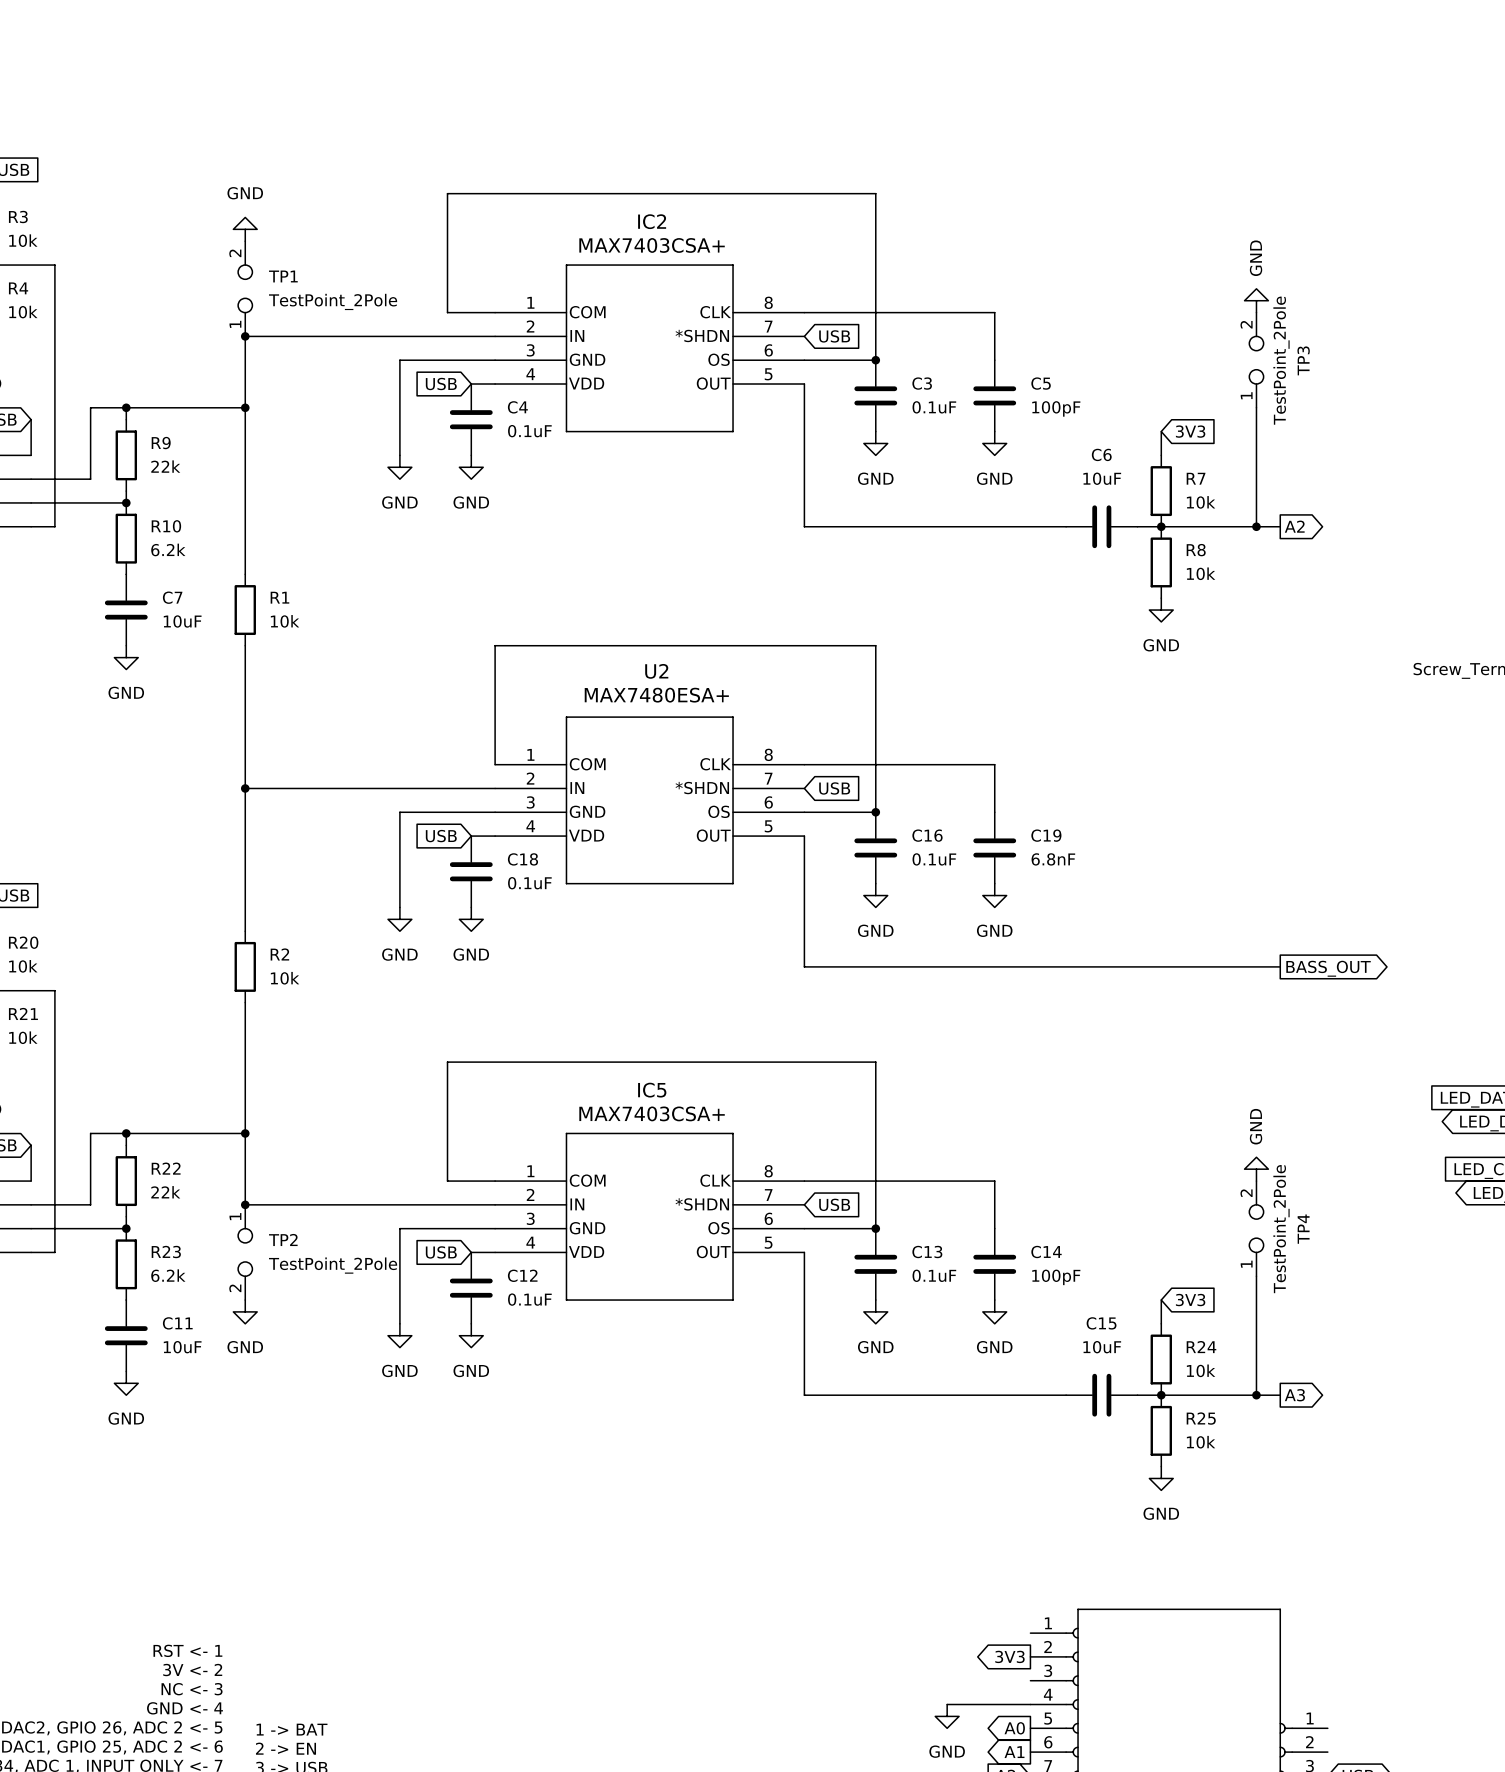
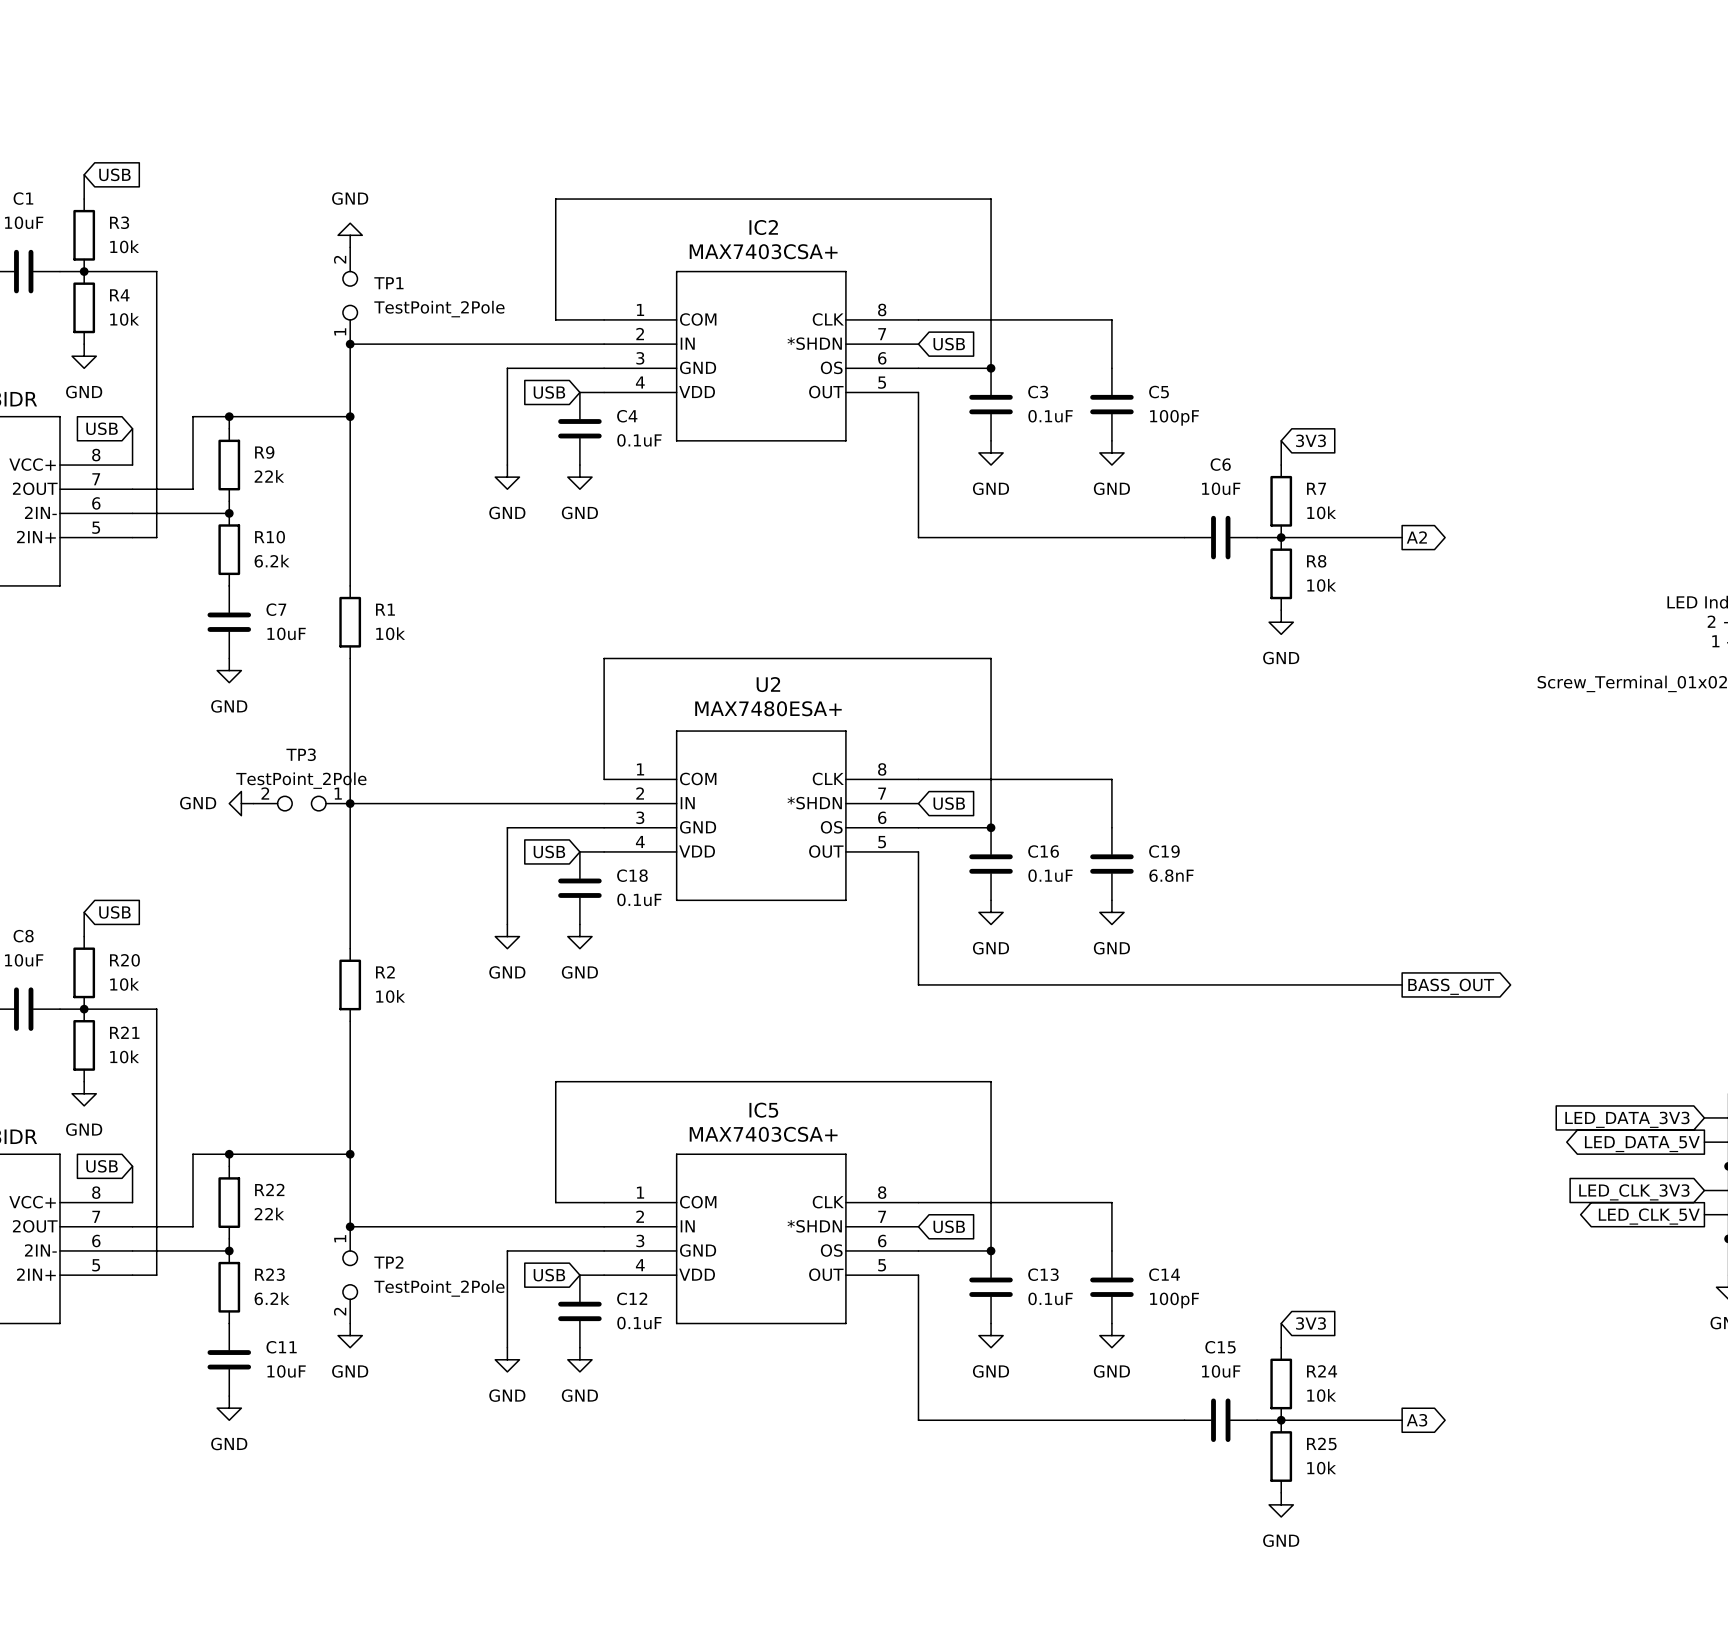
power symbol: GND (1256, 300) -> none
TP3 rotation: 0° (1256, 360) -> 90° counterclockwise (301, 803)
TP3 position: (1256, 360) -> (301, 803)
wire: (1256, 407) (1256, 526) -> none
junction: (1256, 526) -> none
power symbol: none -> GND (241, 803)
power symbol: GND (1256, 1169) -> none
TP4: TestPoint_2Pole (1256, 1228) -> none
wire: (1256, 1276) (1256, 1395) -> none
junction: (1256, 1395) -> none

